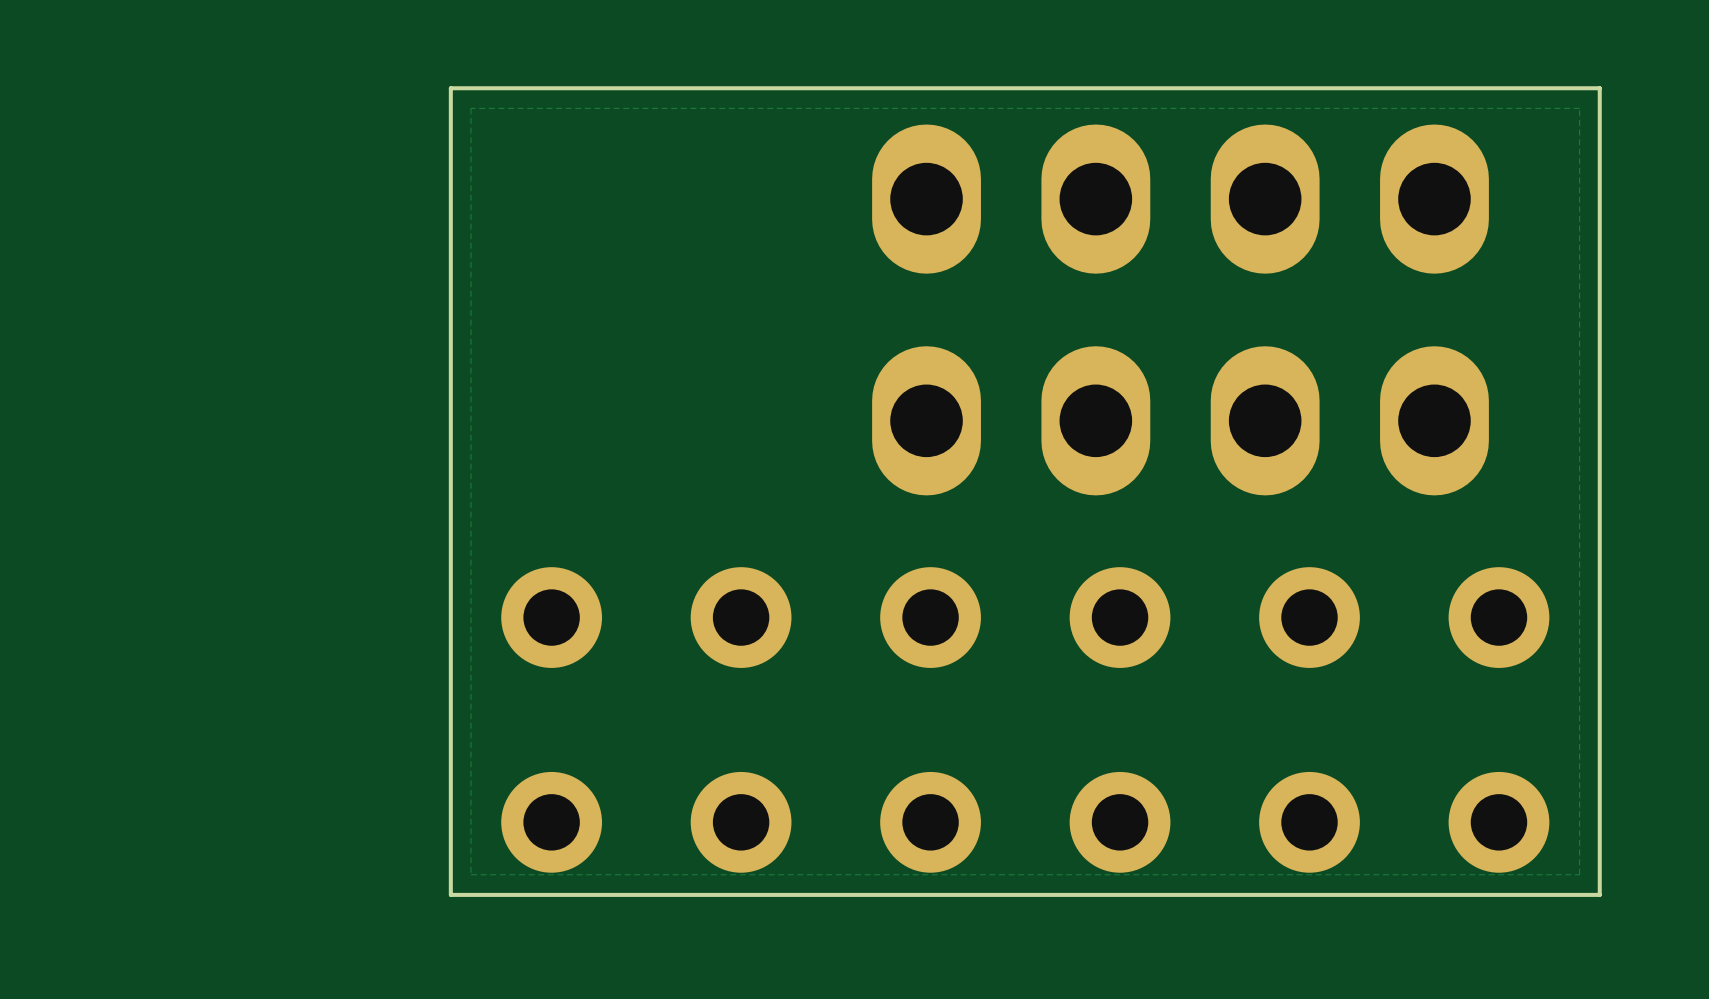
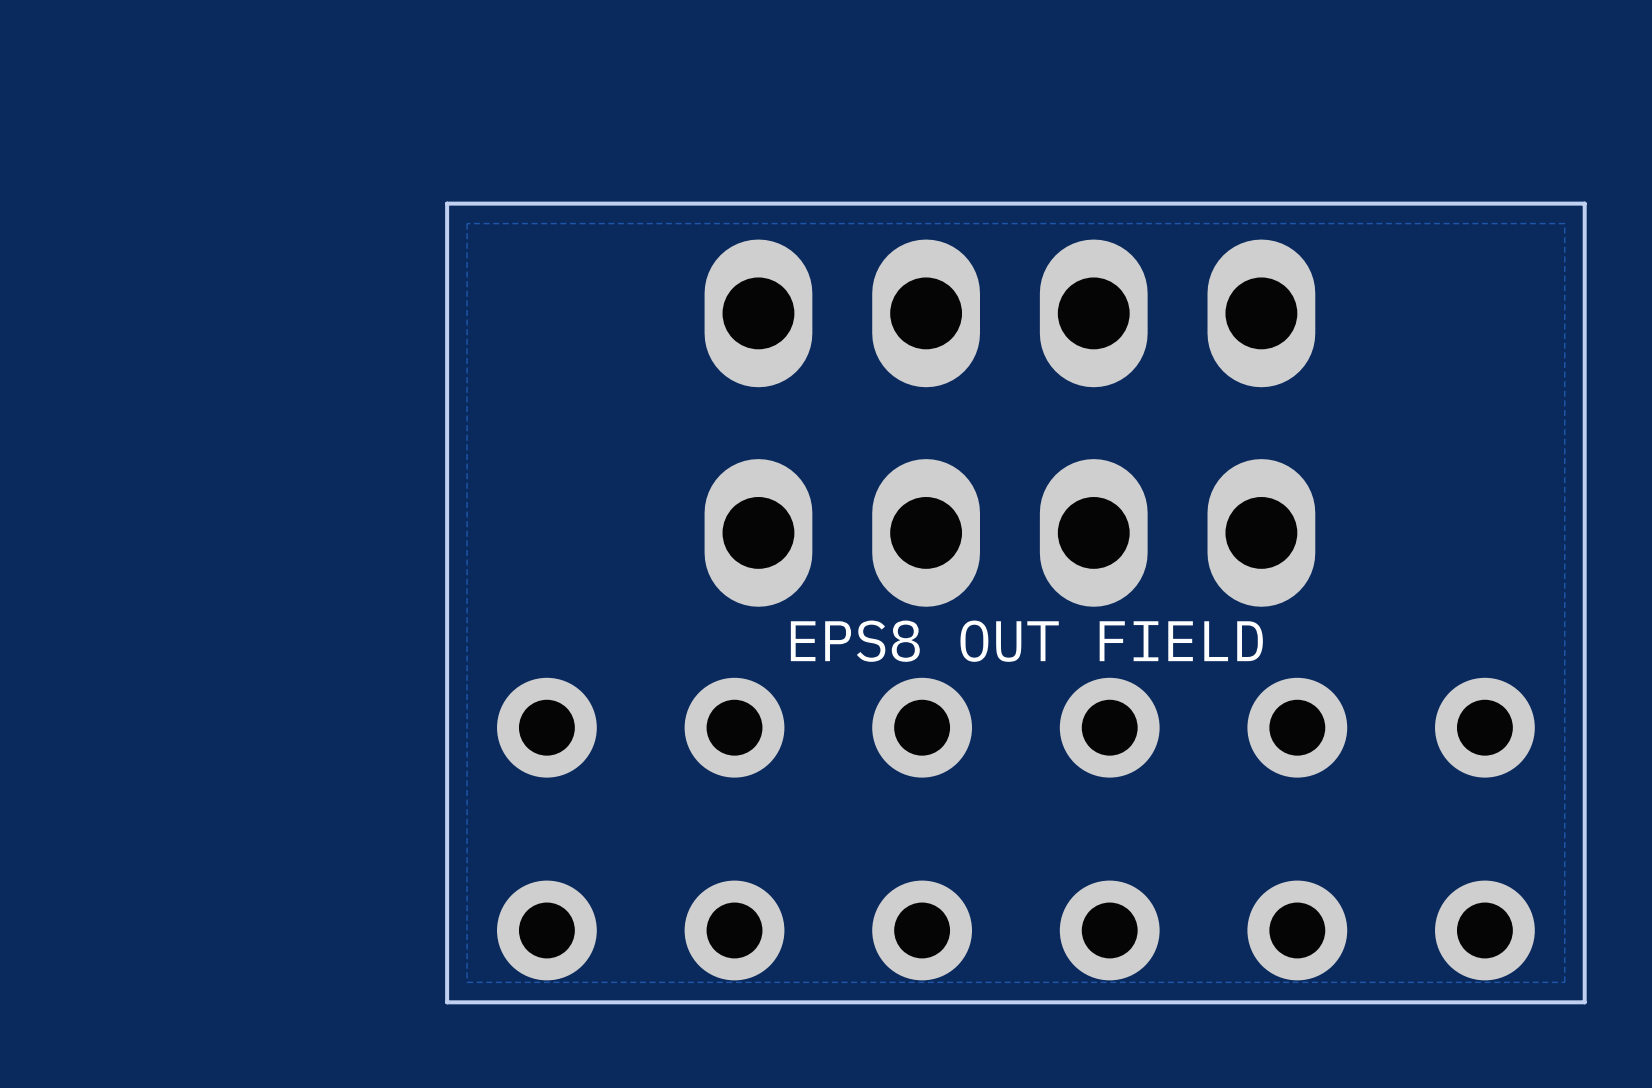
part: none -> EPS8 OUT FIELD (1009, 423)
part: (1180, 309) -> none

